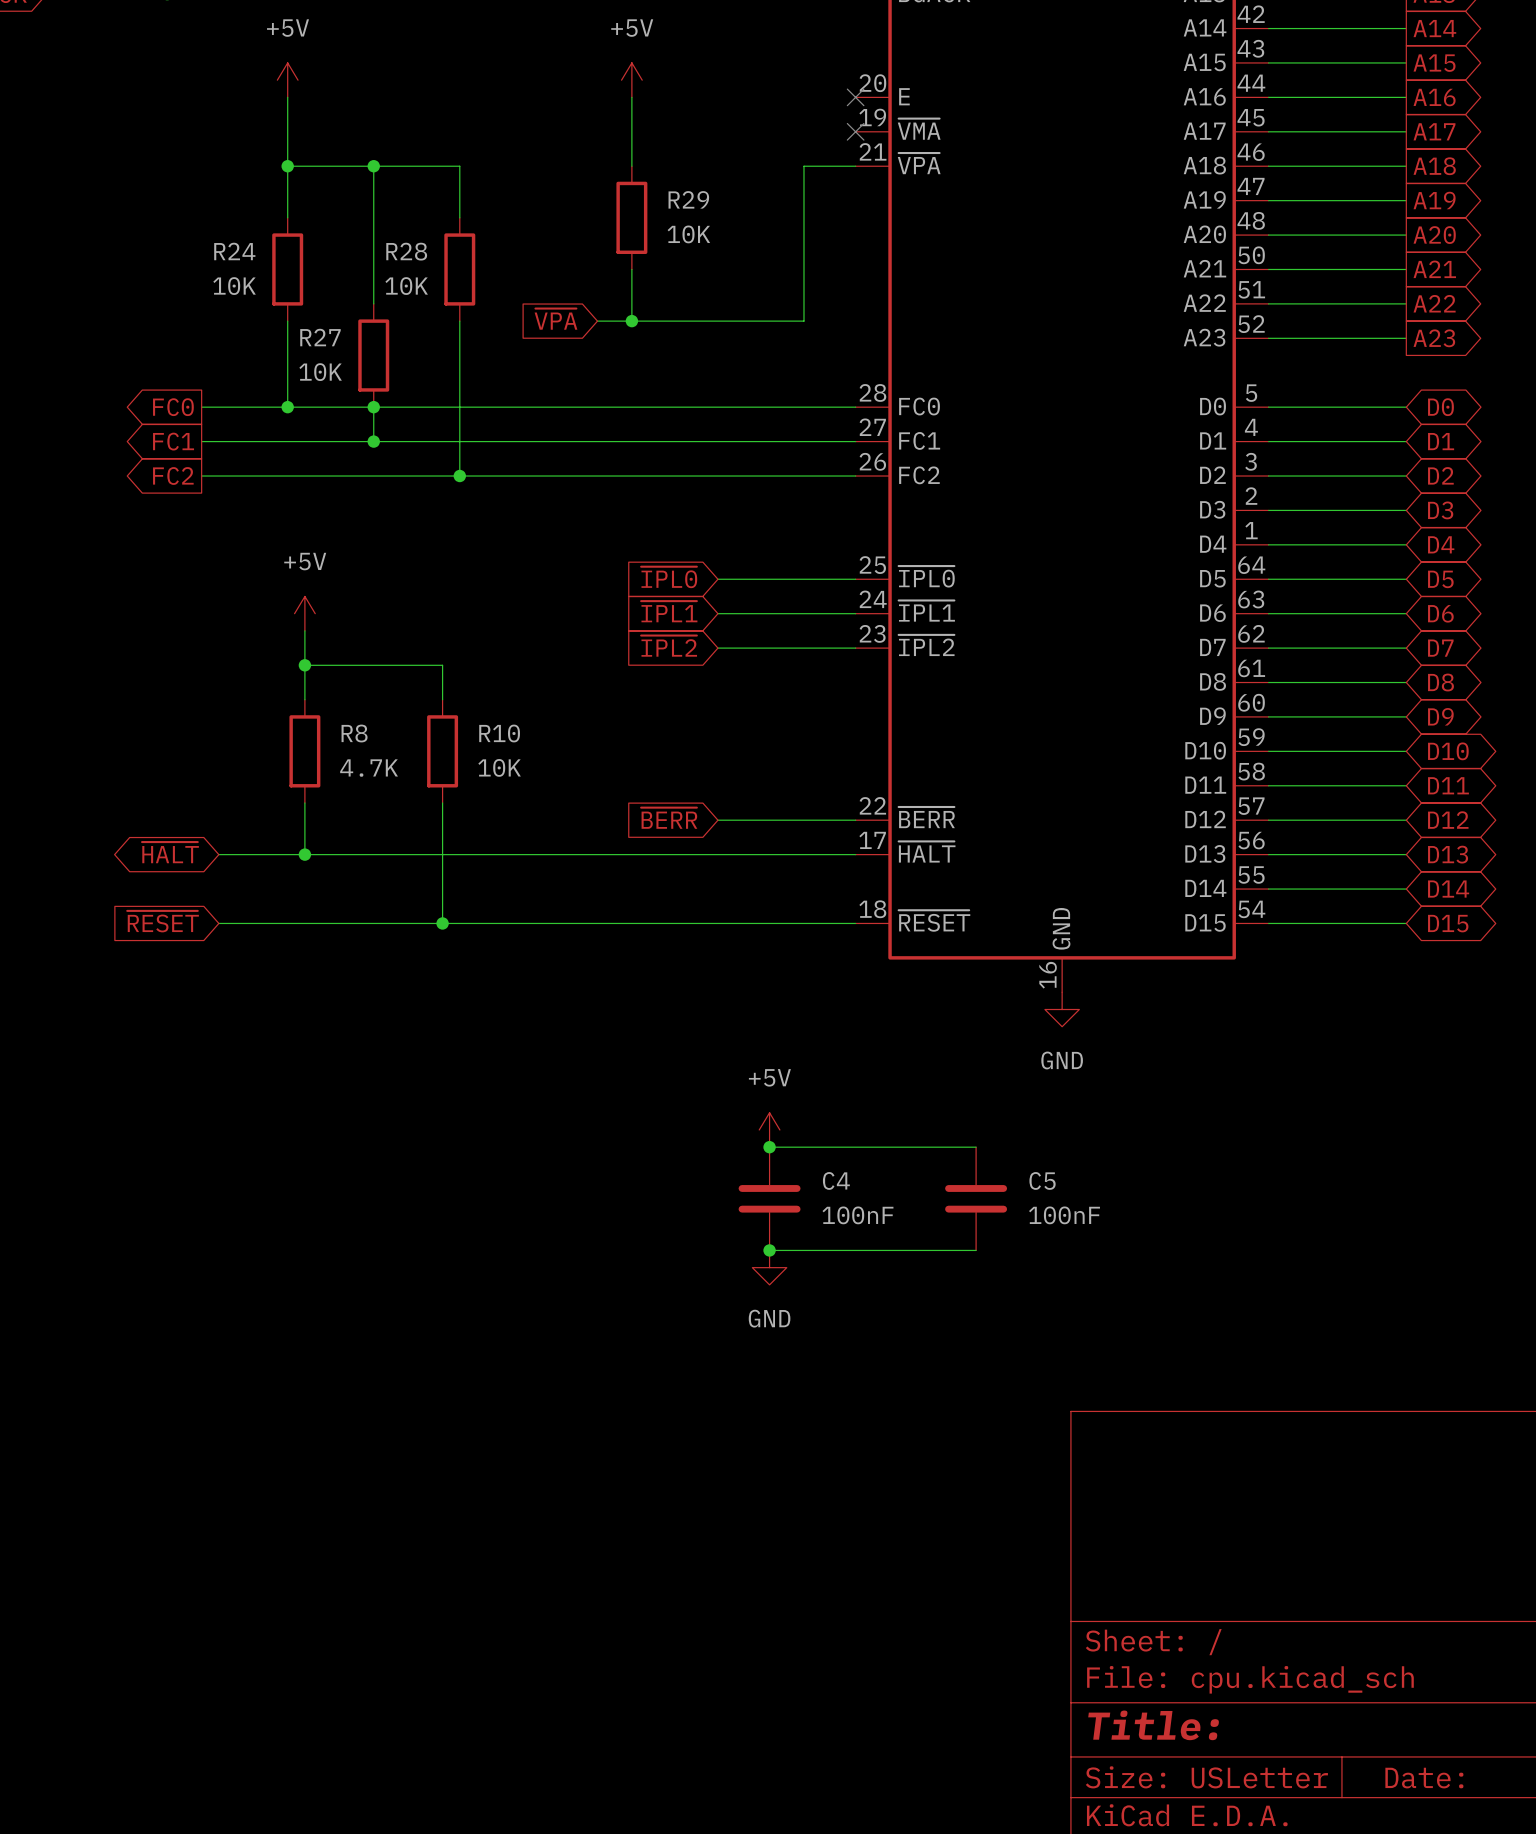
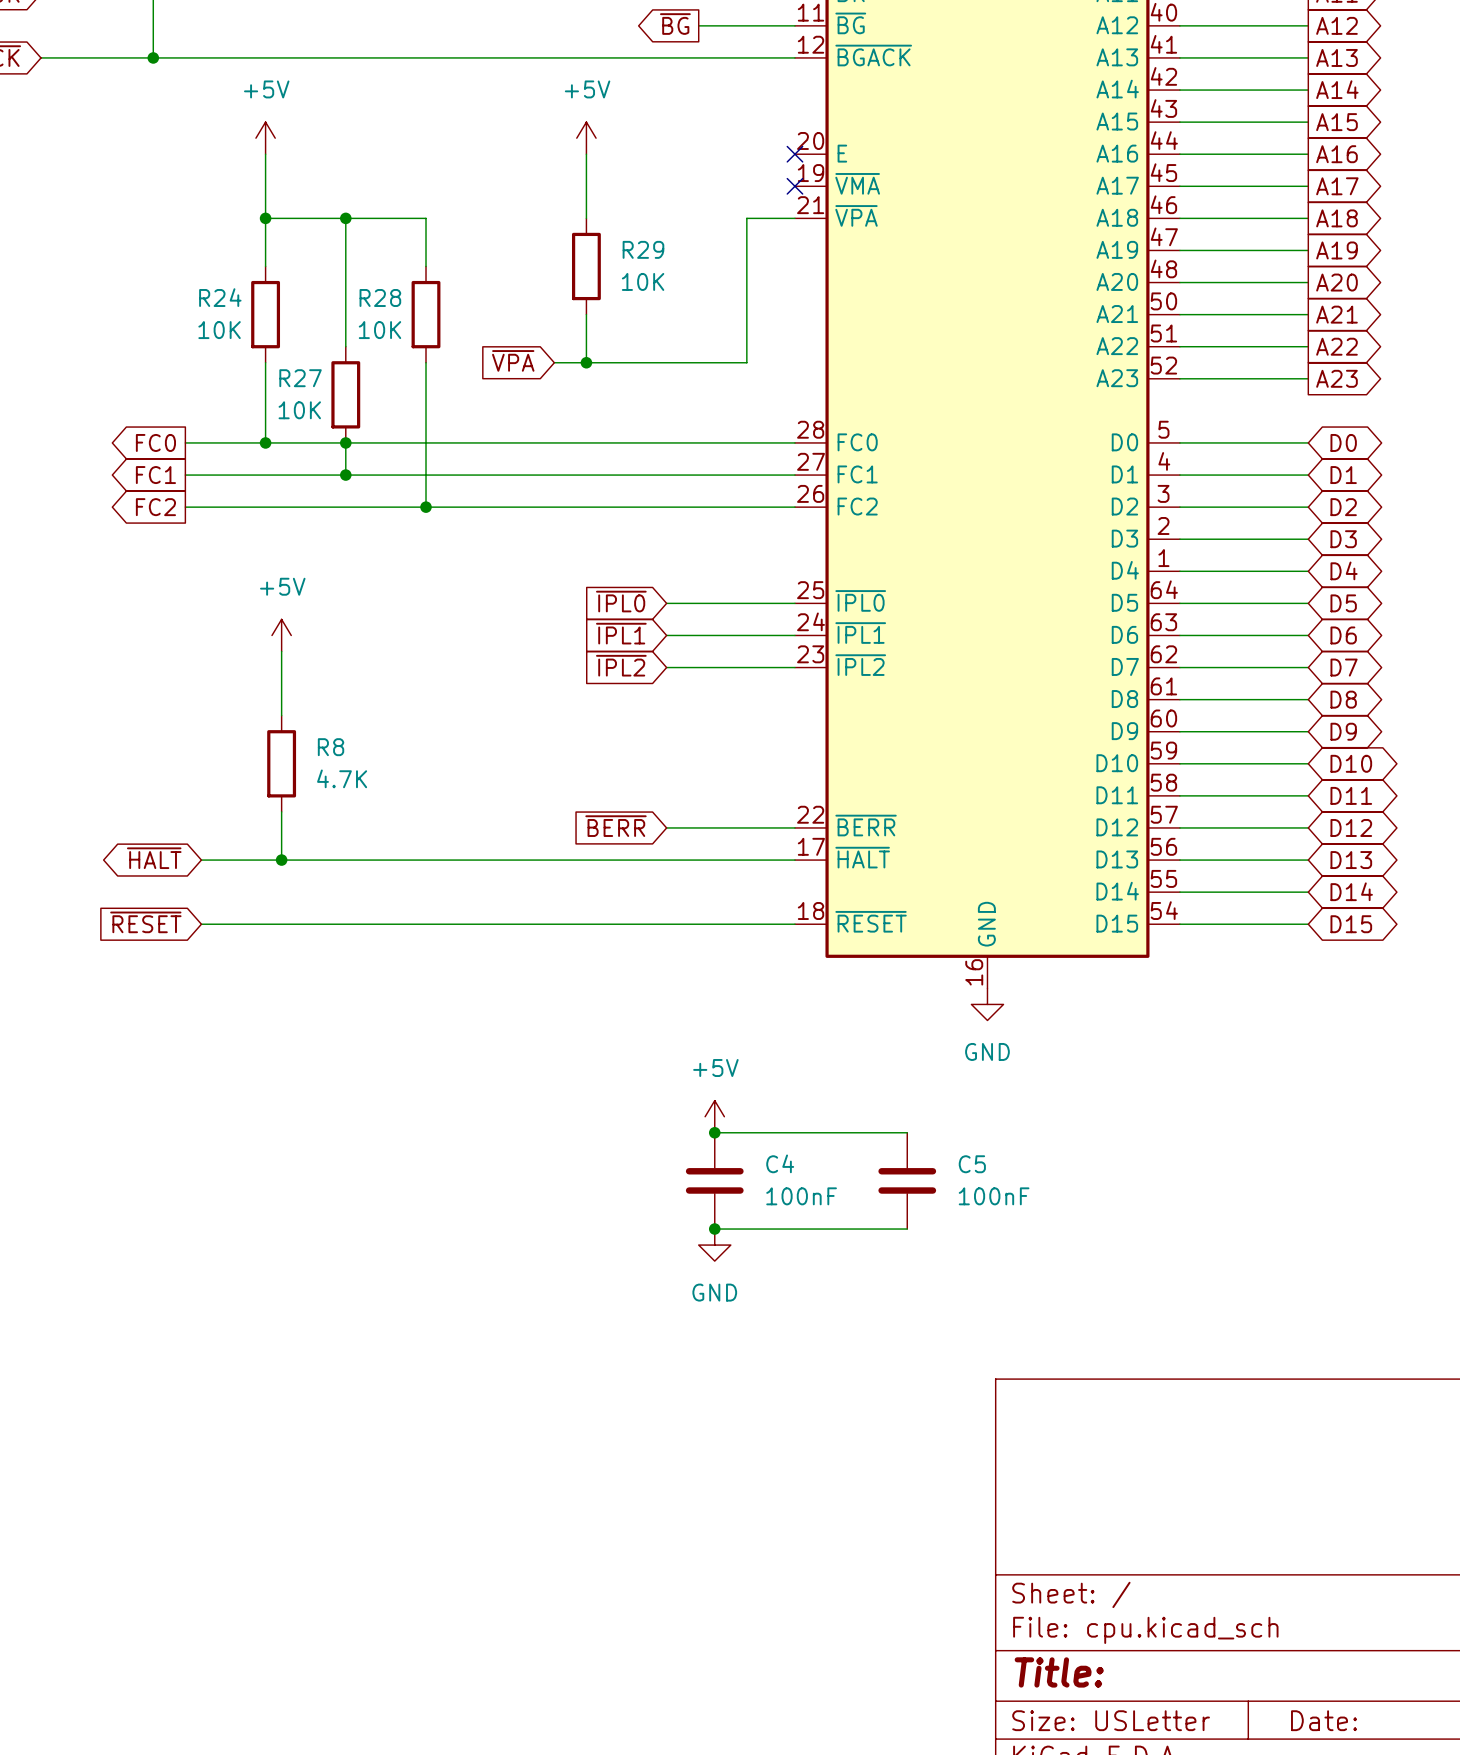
wire: (304, 665) (442, 665) (442, 699) -> none
junction: (304, 665) -> none
R10: 10K (442, 751) -> none
wire: (442, 802) (442, 923) -> none
junction: (442, 923) -> none

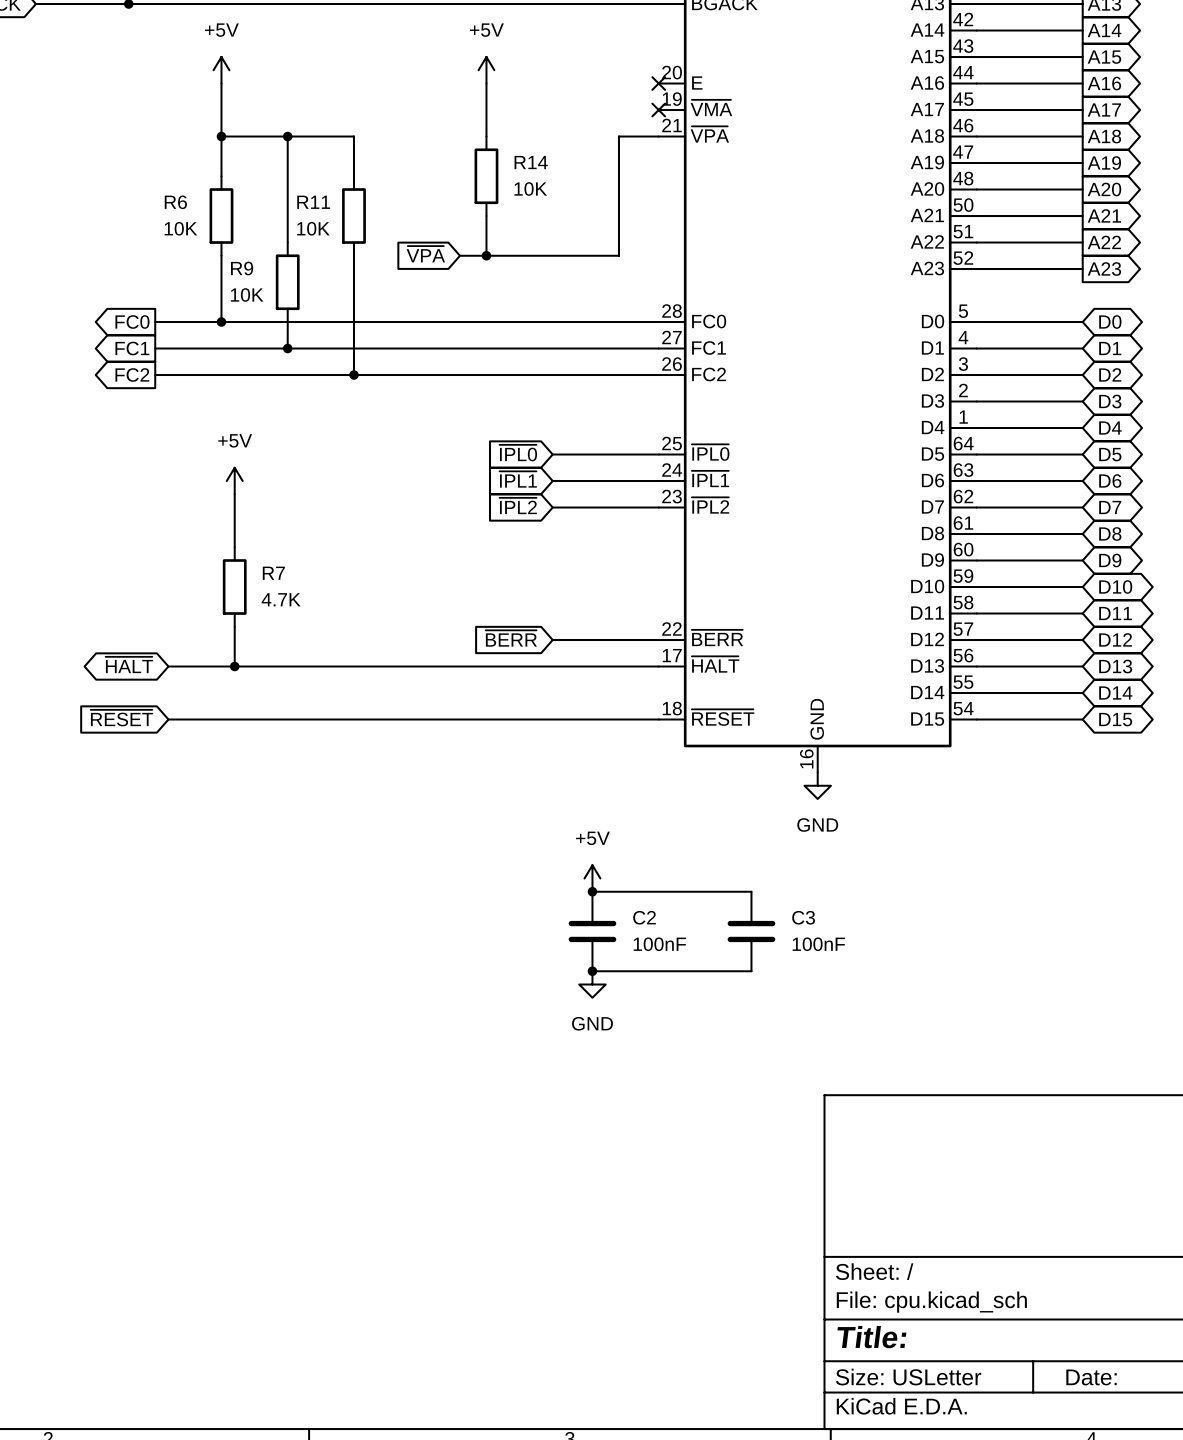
R29 name: R29 (643, 249) -> R14 (531, 162)
R24 name: R24 (220, 297) -> R6 (175, 202)
R28 name: R28 (380, 297) -> R11 (313, 202)
R27 name: R27 (300, 378) -> R9 (242, 268)
junction: (345, 442) -> none
R8 name: R8 (331, 747) -> R7 (273, 573)
C4 name: C4 (780, 1163) -> C2 (644, 917)
C5 name: C5 (972, 1164) -> C3 (803, 917)

